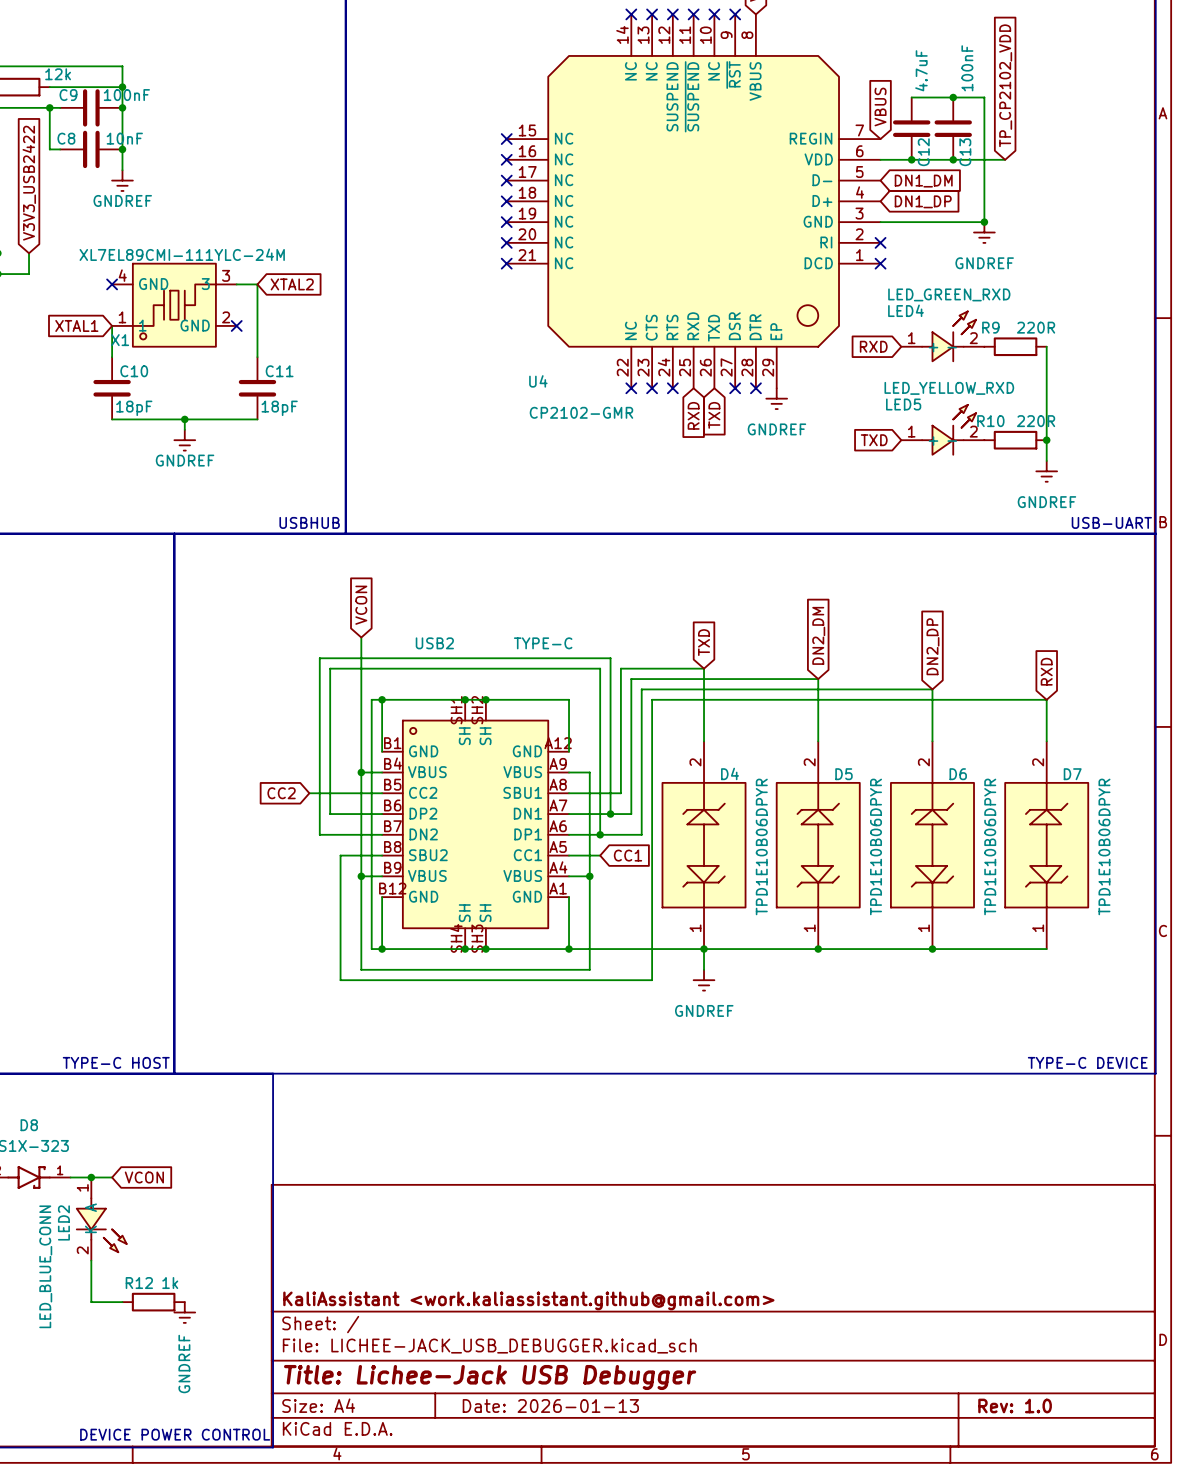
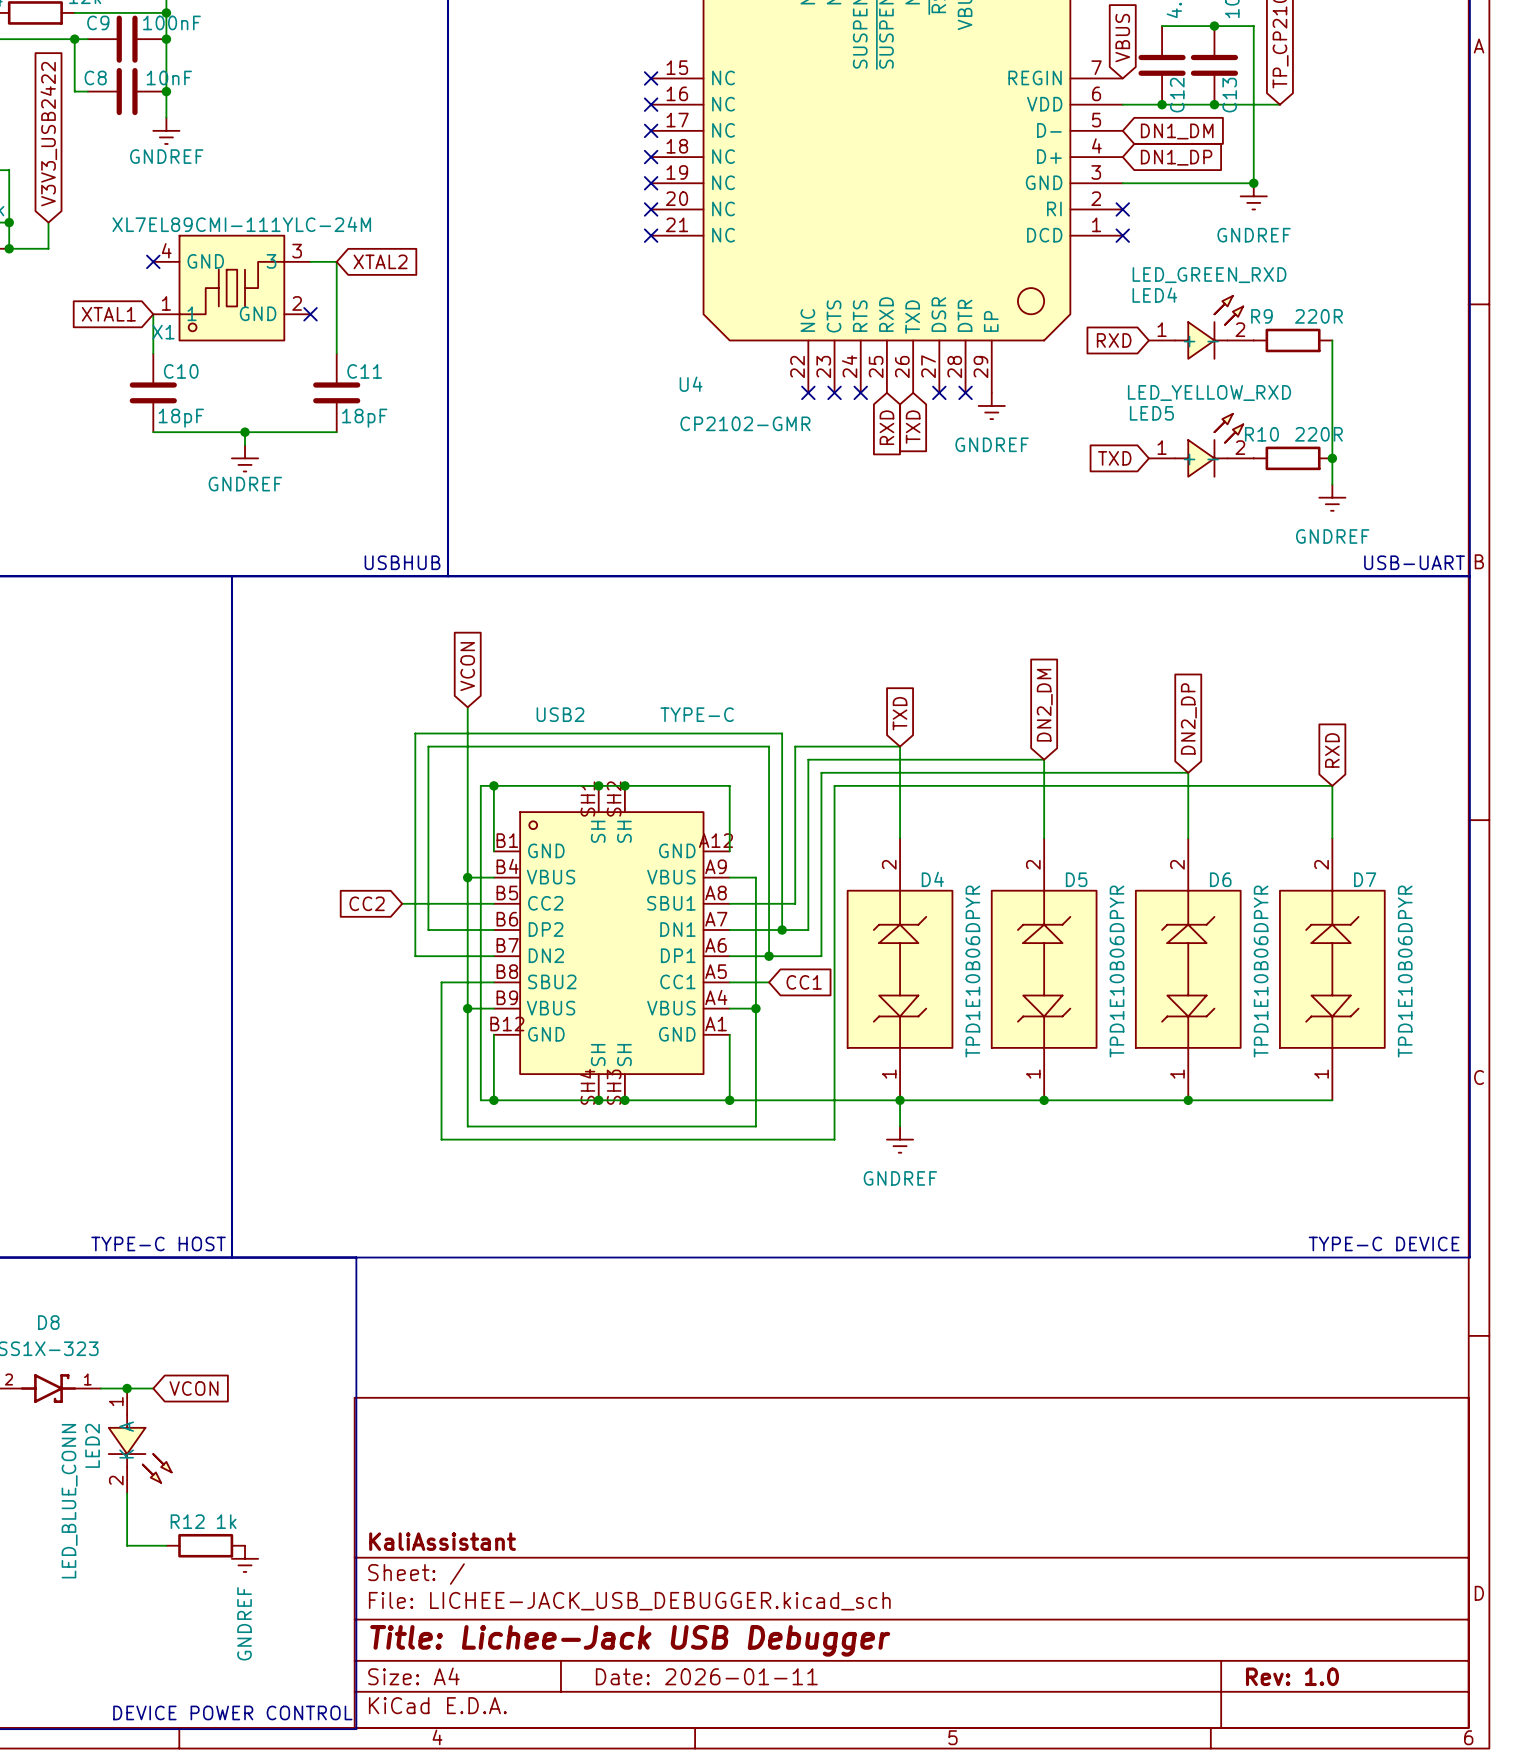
title block: KaliAssistant <work.kaliassistant.github@gmail.com> (528, 1300) -> KaliAssistant (442, 1541)
title block: Date: 2026-01-13 (550, 1405) -> Date: 2026-01-11 (706, 1676)

